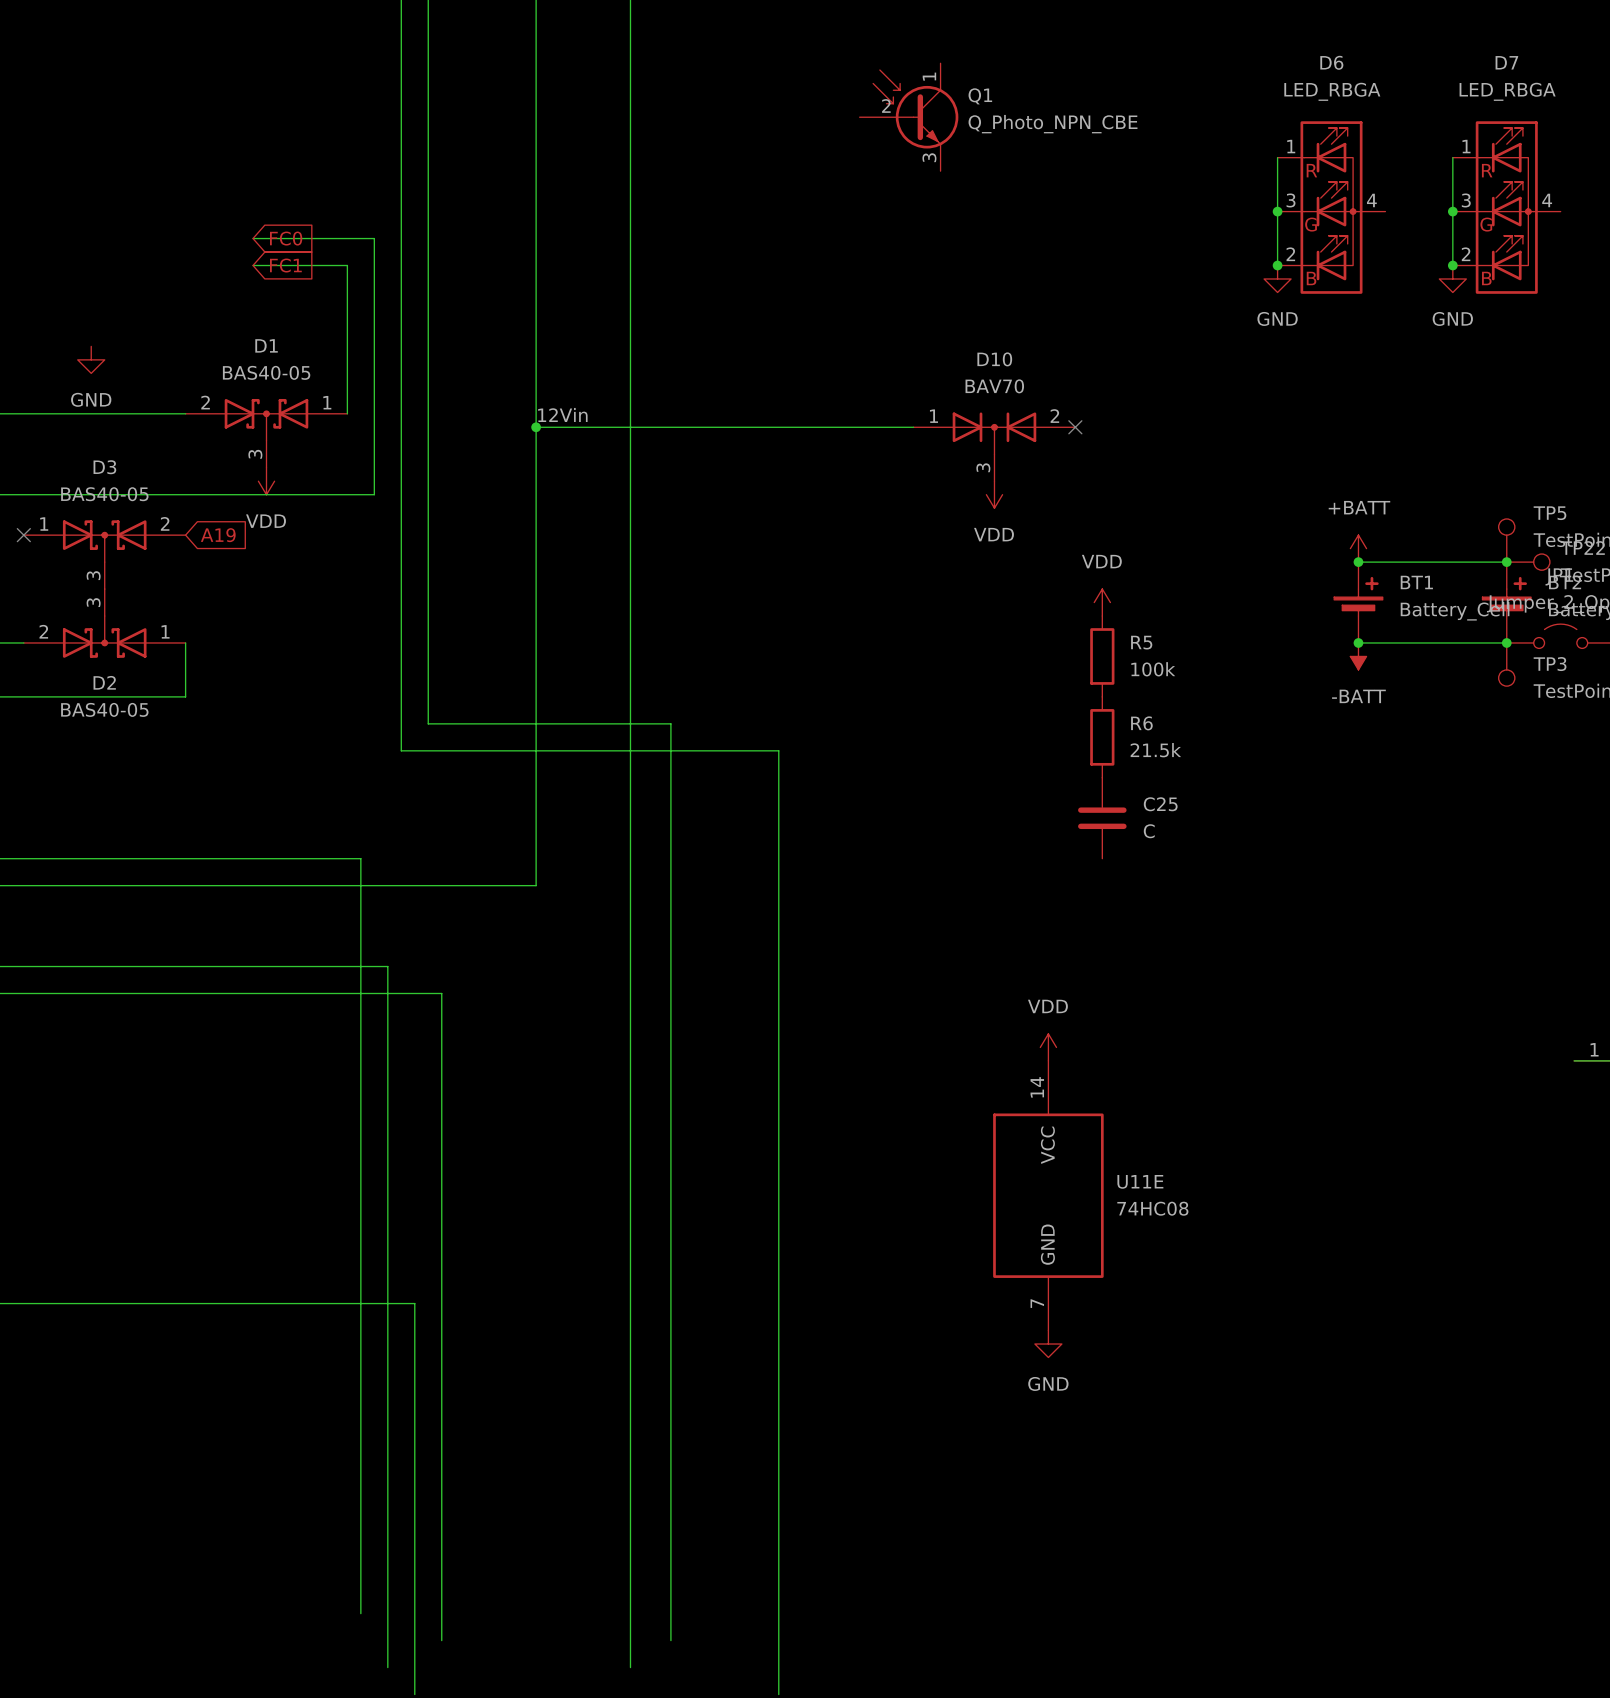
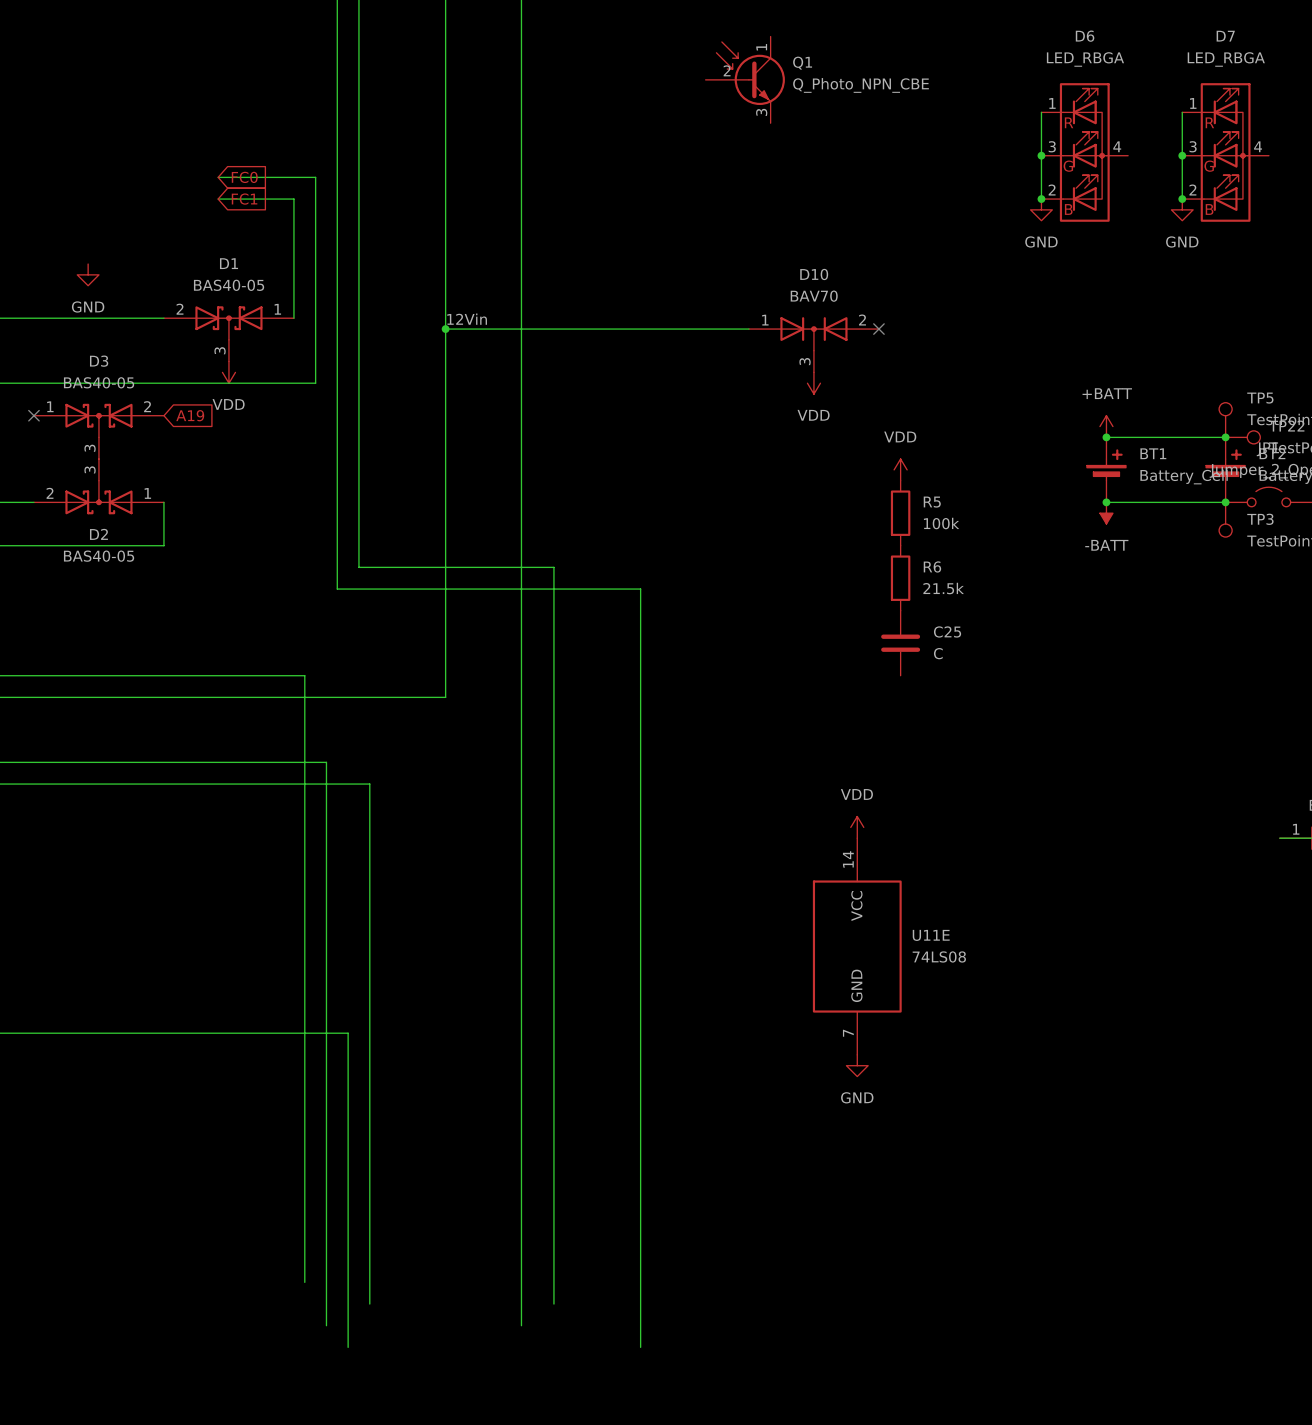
U11E value: 74HC08 (1152, 1208) -> 74LS08 (939, 956)

